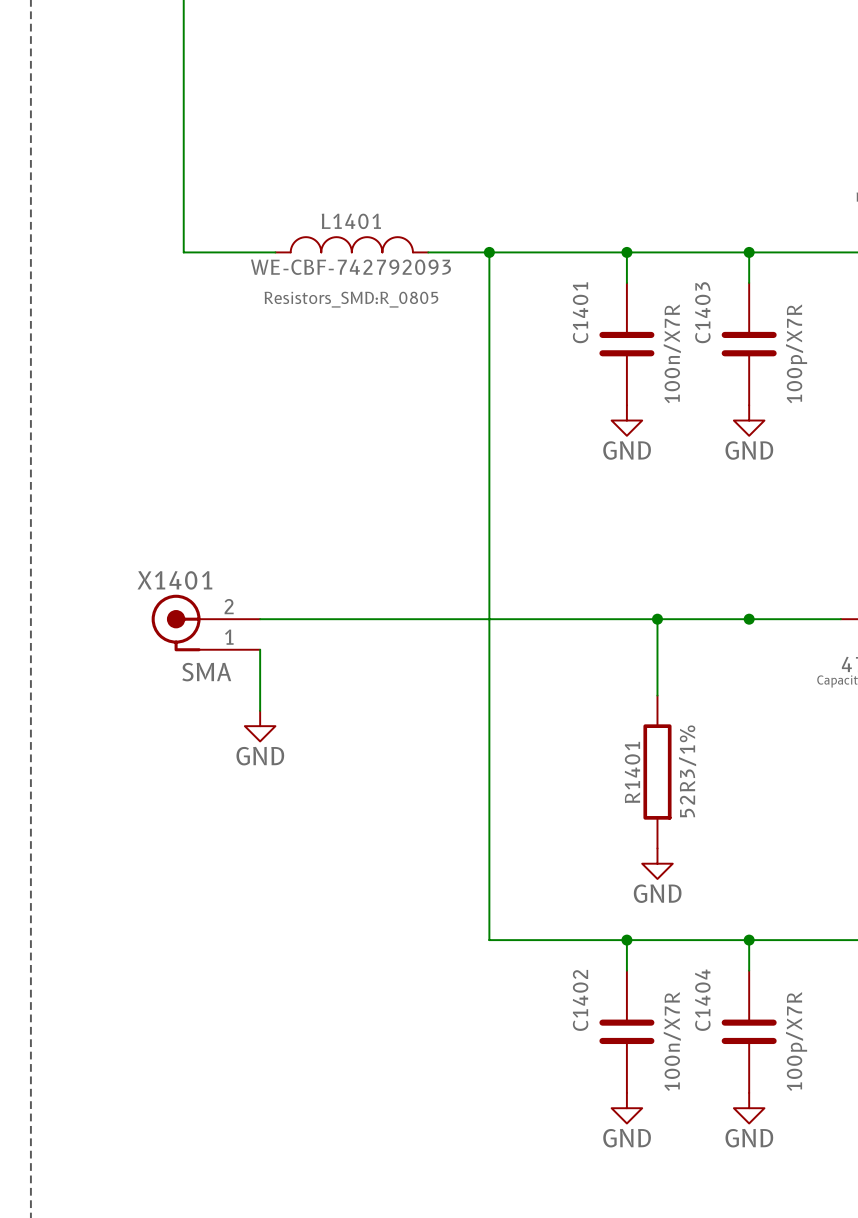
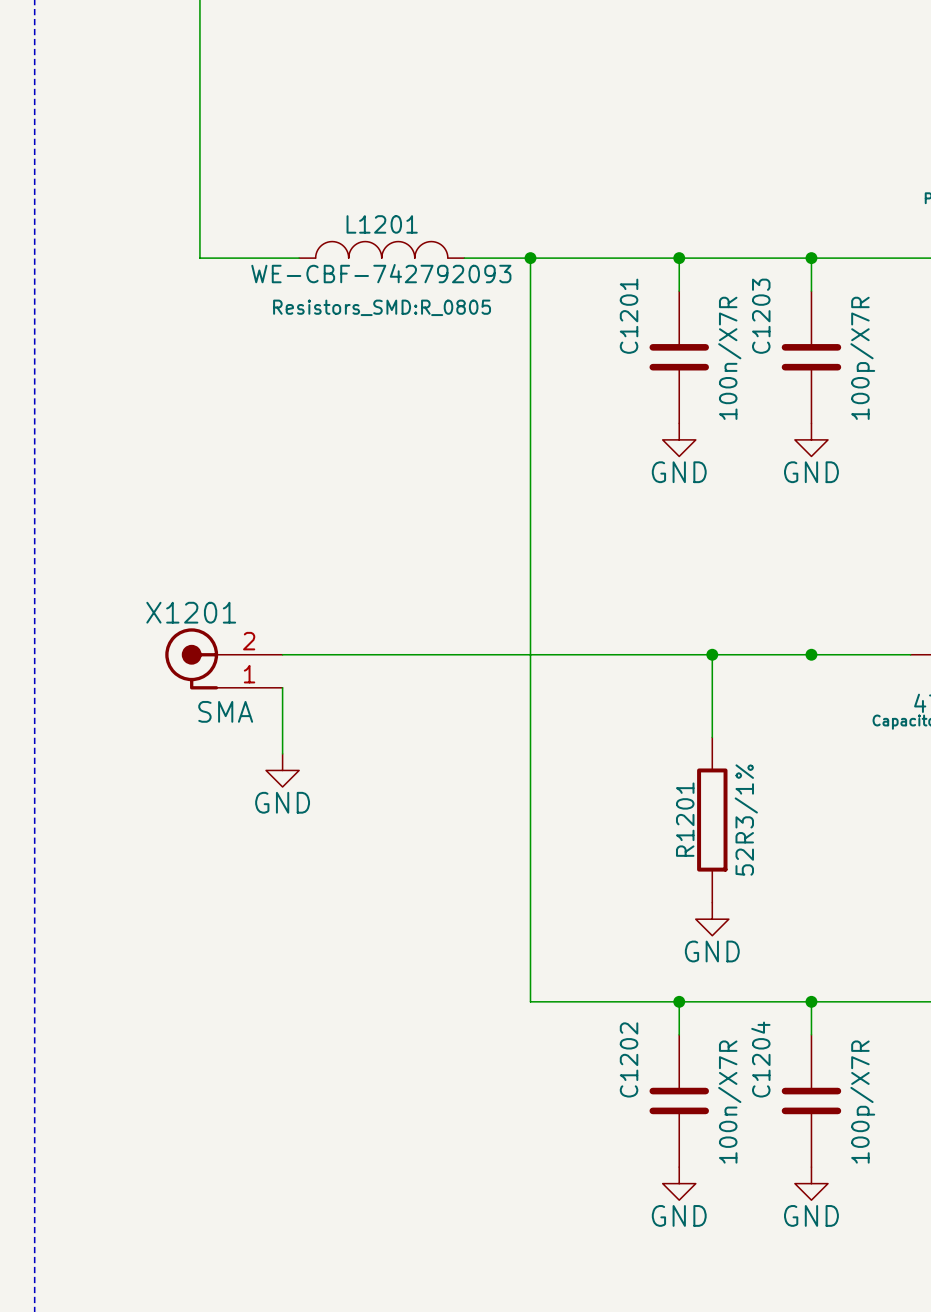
L1401 name: L1401 (351, 221) -> L1201 (382, 224)
C1401 name: C1401 (580, 312) -> C1201 (629, 316)
C1403 name: C1403 (702, 312) -> C1203 (761, 316)
X1401 name: X1401 (174, 580) -> X1201 (191, 612)
R1401 name: R1401 (632, 772) -> R1201 (685, 819)
C1402 name: C1402 (580, 1000) -> C1202 (629, 1059)
C1404 name: C1404 (702, 1000) -> C1204 (760, 1059)

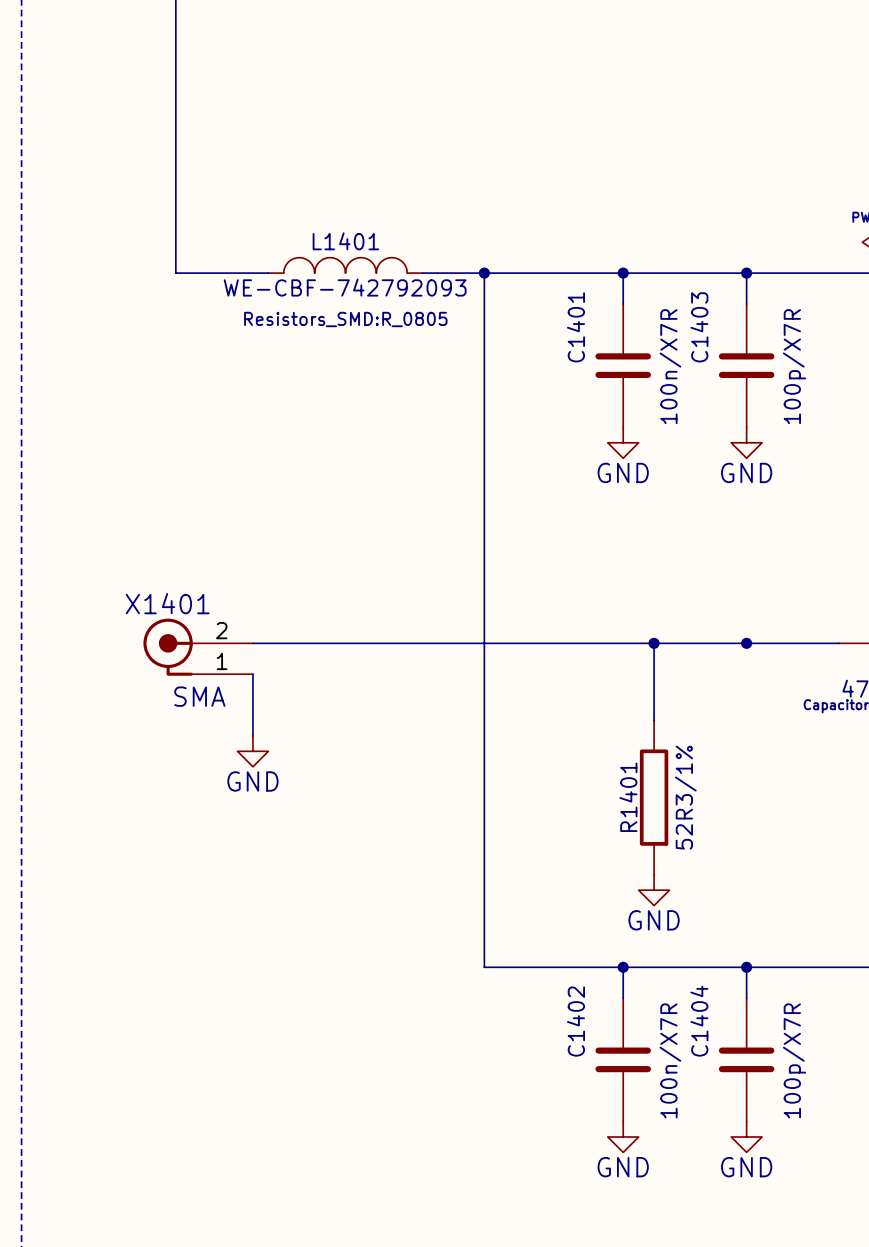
L1201 name: L1201 (382, 224) -> L1401 (345, 241)
C1201 name: C1201 (629, 316) -> C1401 (575, 327)
C1203 name: C1203 (761, 316) -> C1403 (699, 327)
X1201 name: X1201 (191, 612) -> X1401 (167, 603)
R1201 name: R1201 (685, 819) -> R1401 (628, 797)
C1202 name: C1202 (629, 1059) -> C1402 (575, 1021)
C1204 name: C1204 (760, 1059) -> C1404 (699, 1021)

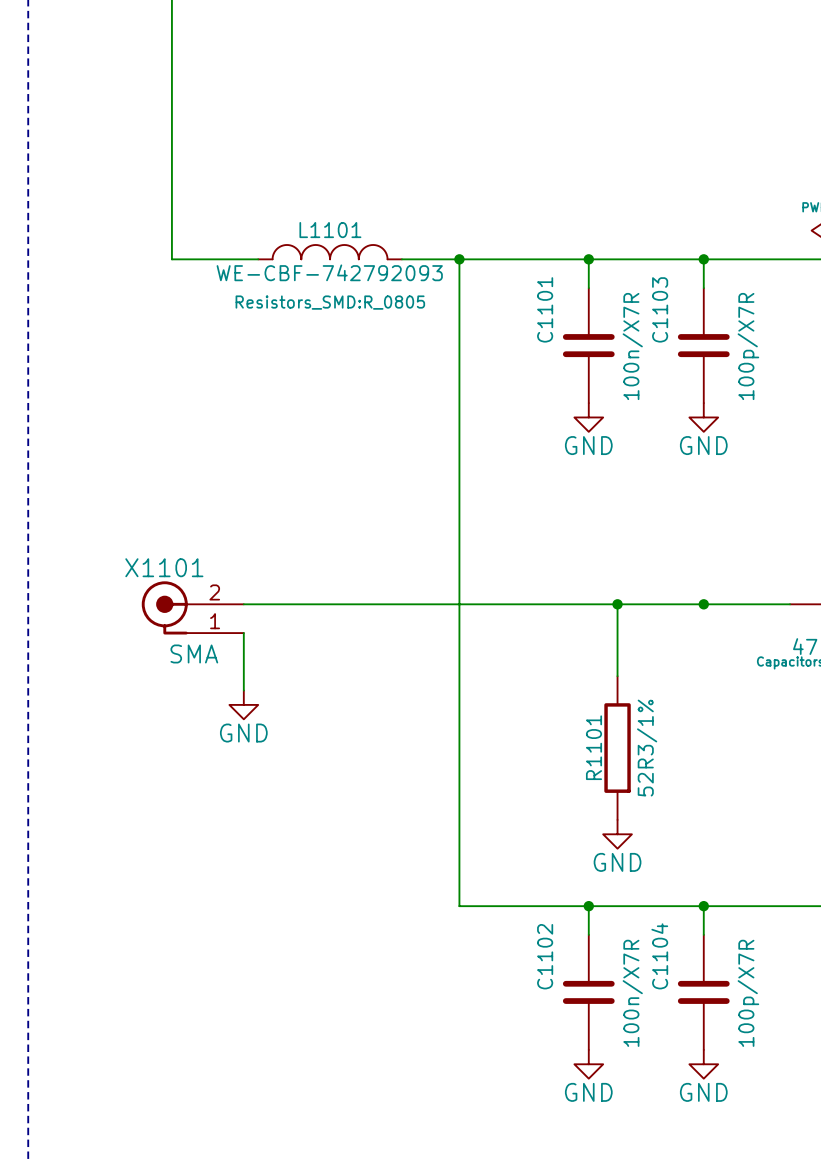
L1401 name: L1401 (345, 241) -> L1101 (330, 230)
C1401 name: C1401 (575, 327) -> C1101 (545, 309)
C1403 name: C1403 (699, 327) -> C1103 (660, 309)
X1401 name: X1401 (167, 603) -> X1101 (164, 567)
R1401 name: R1401 (628, 797) -> R1101 (594, 747)
C1402 name: C1402 (575, 1021) -> C1102 (545, 956)
C1404 name: C1404 (699, 1021) -> C1104 (659, 956)

